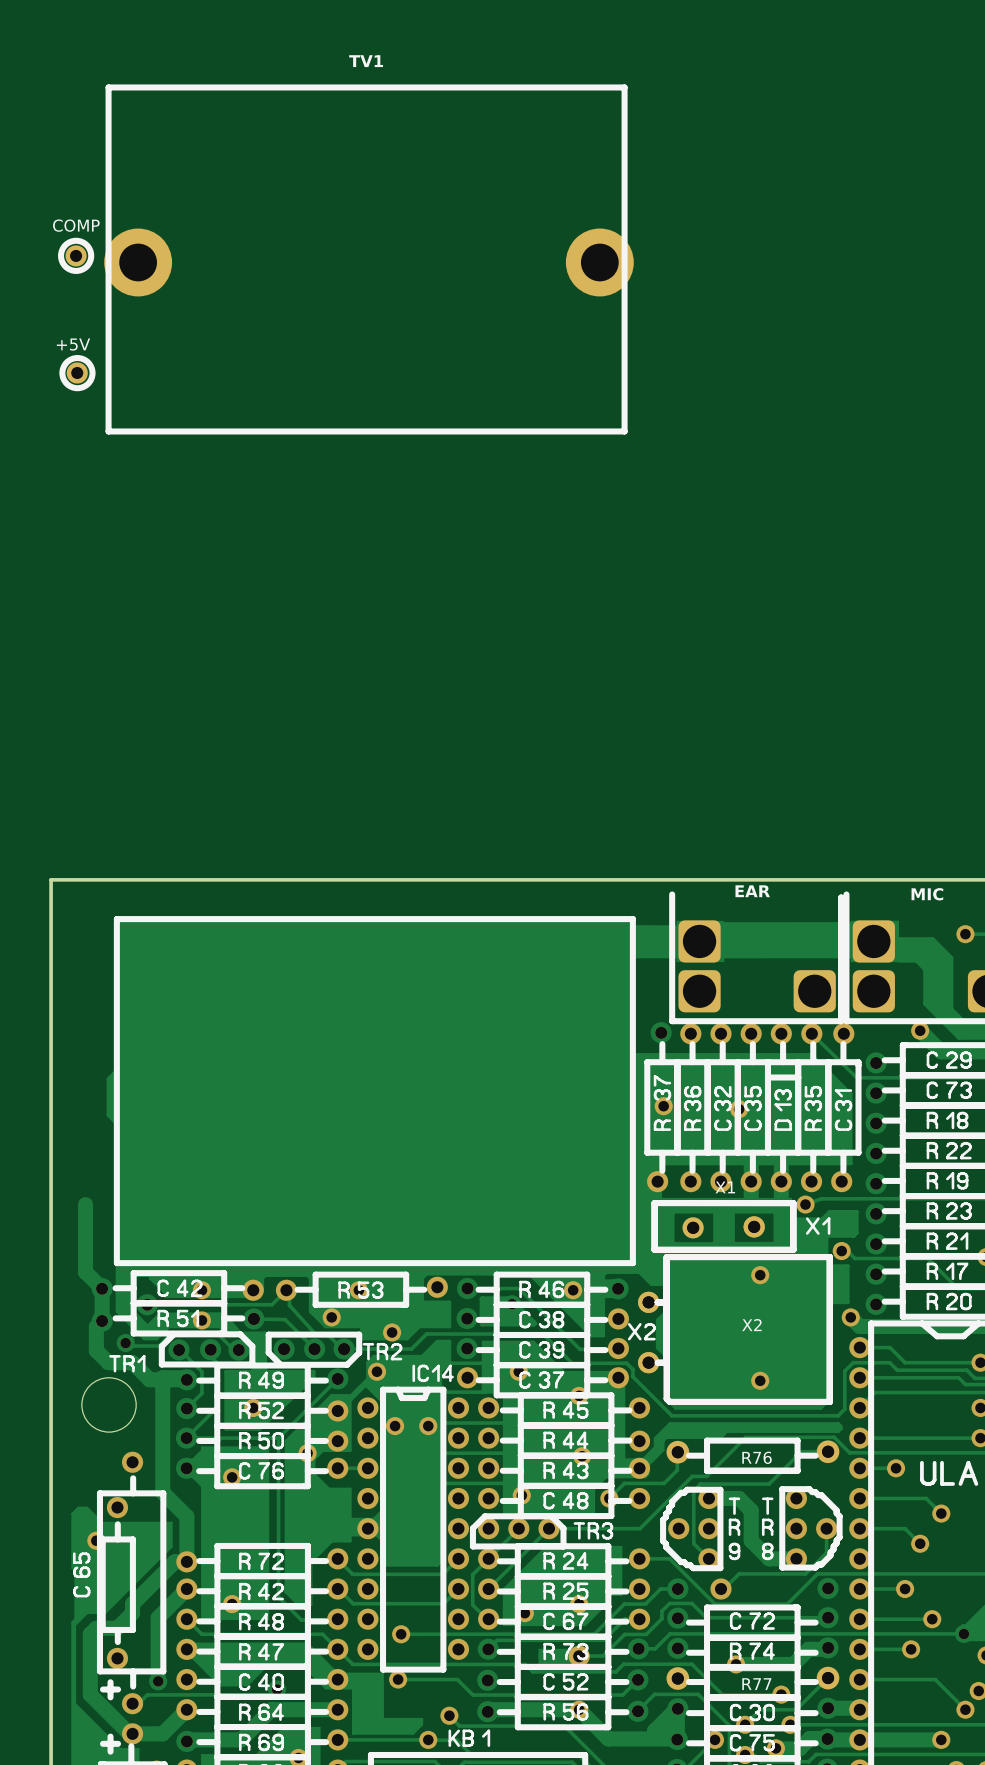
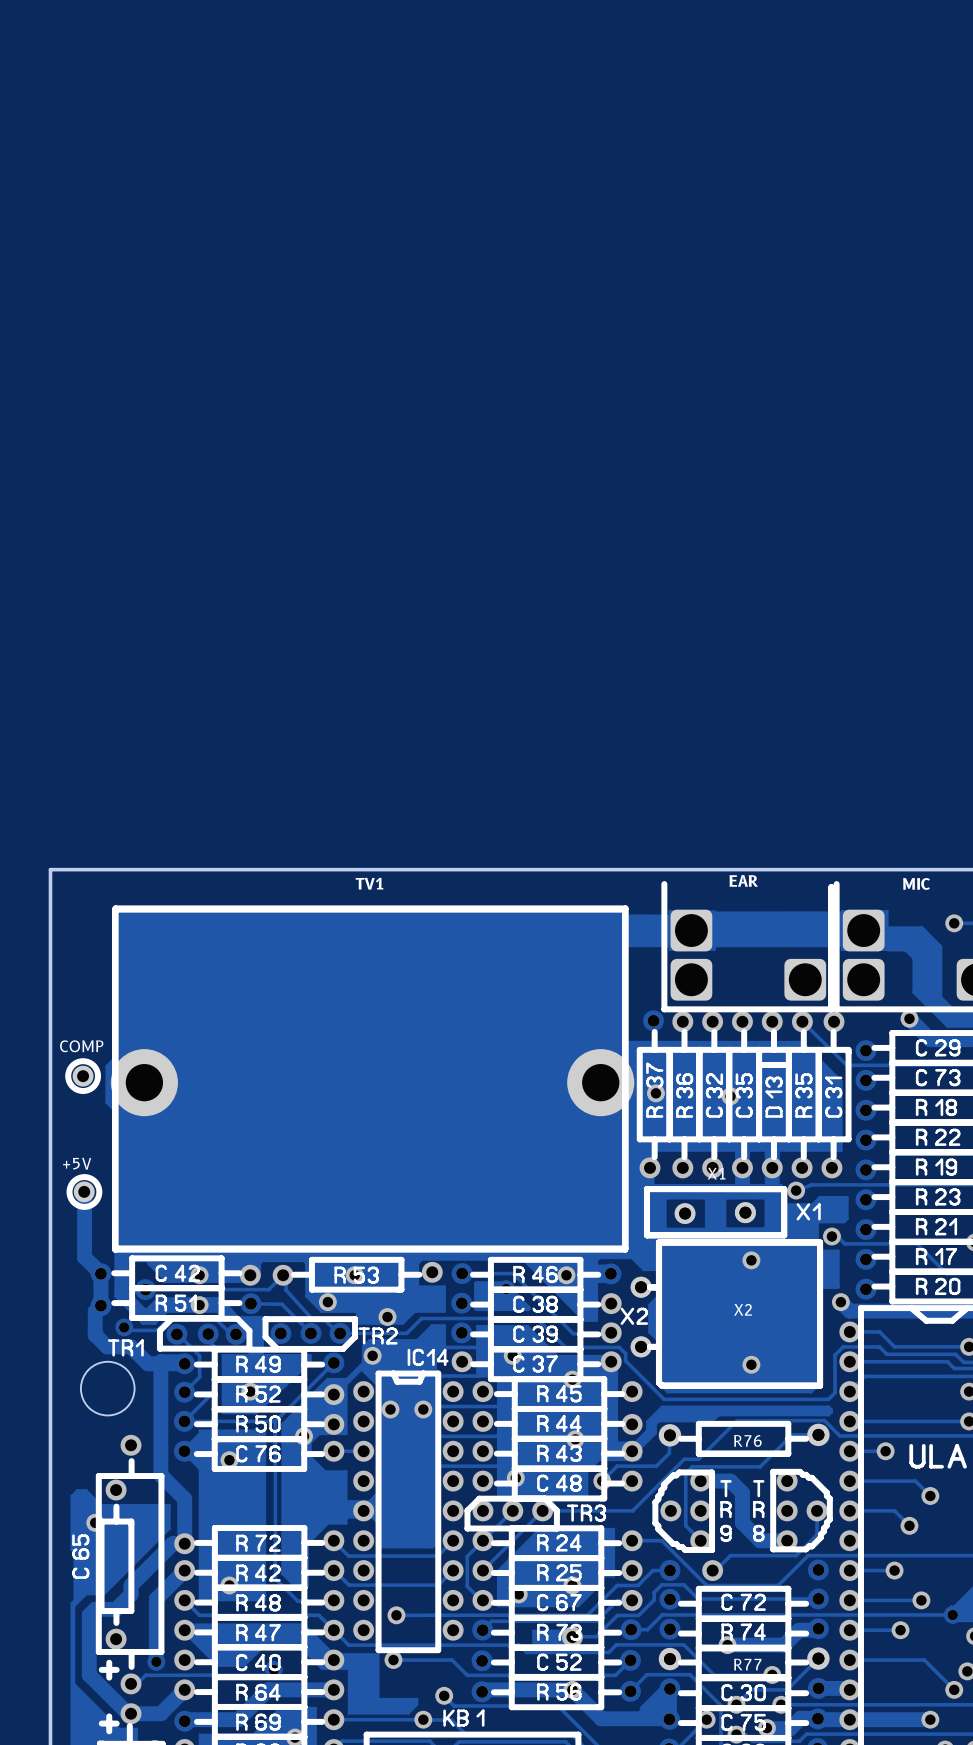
TV1 position: (345, 259) -> (349, 1079)

